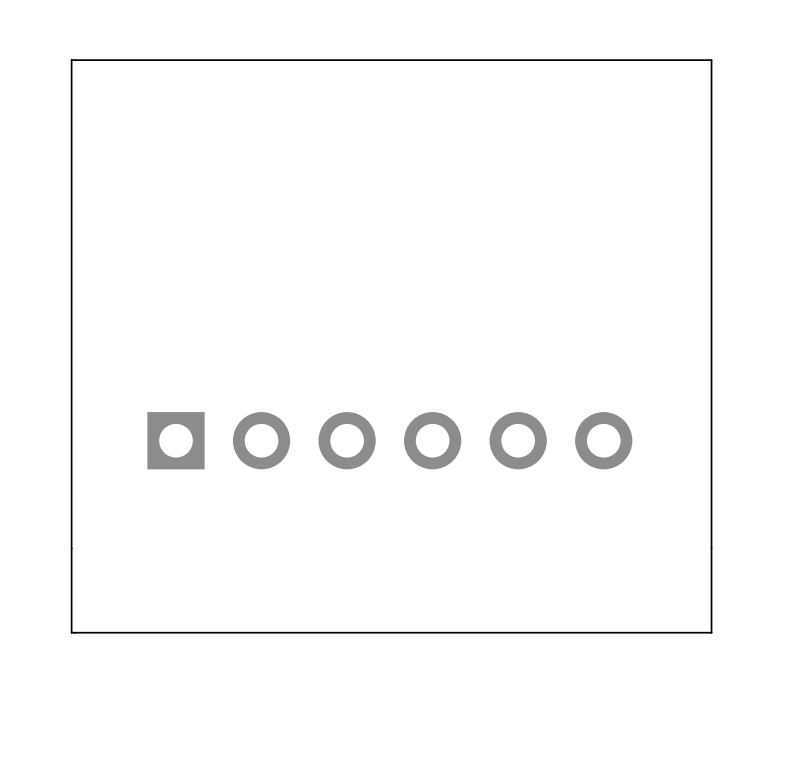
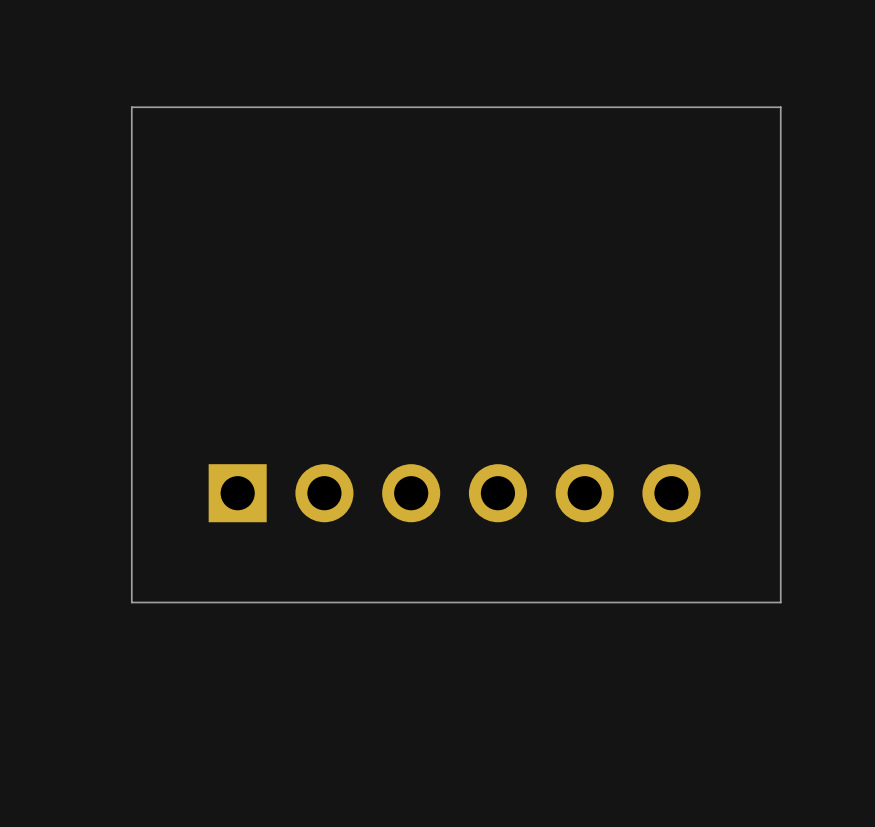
board edge: (711, 548) (711, 632) (71, 632) (71, 548) -> (780, 602) (131, 602)

